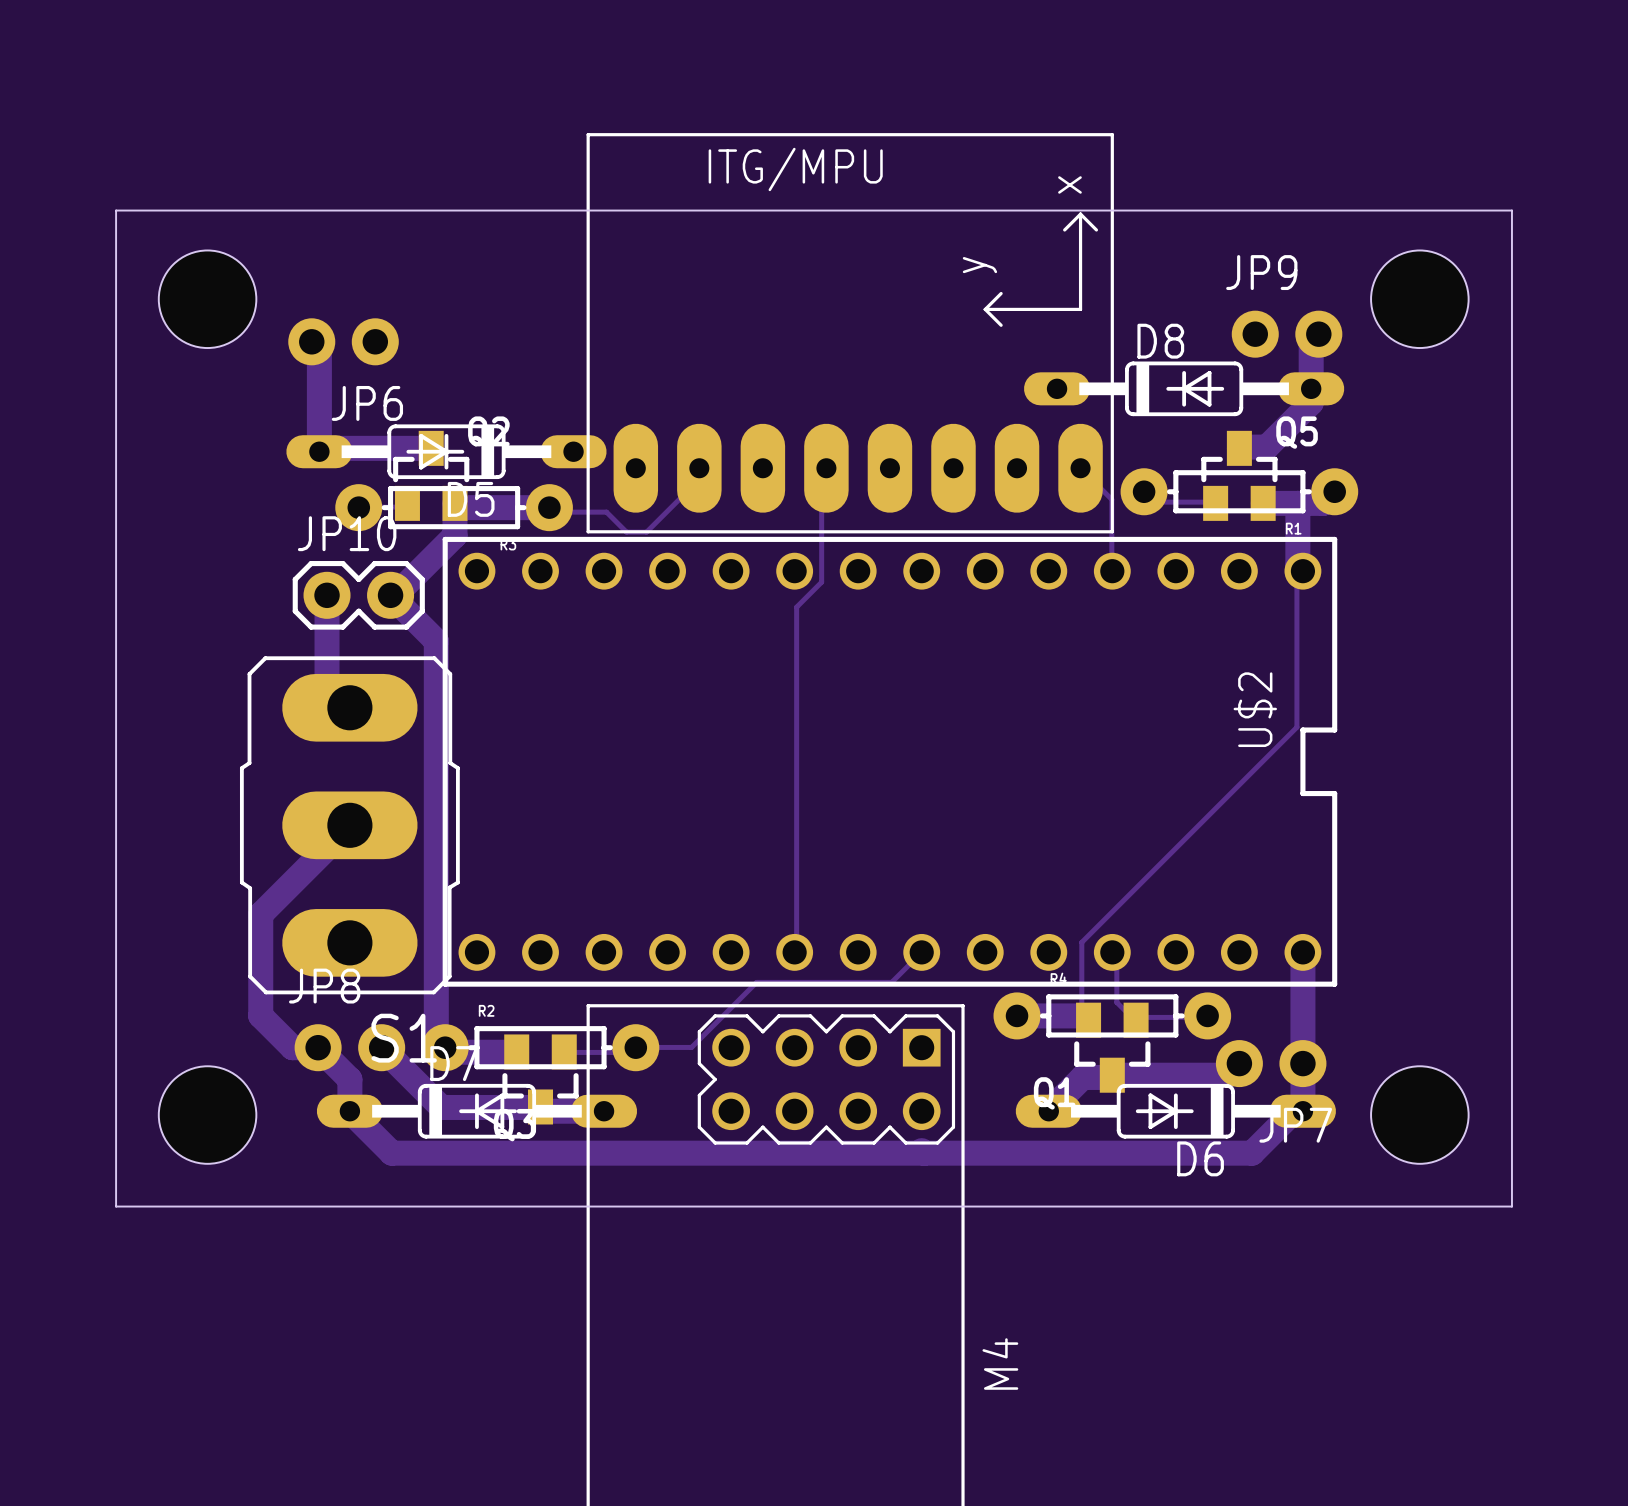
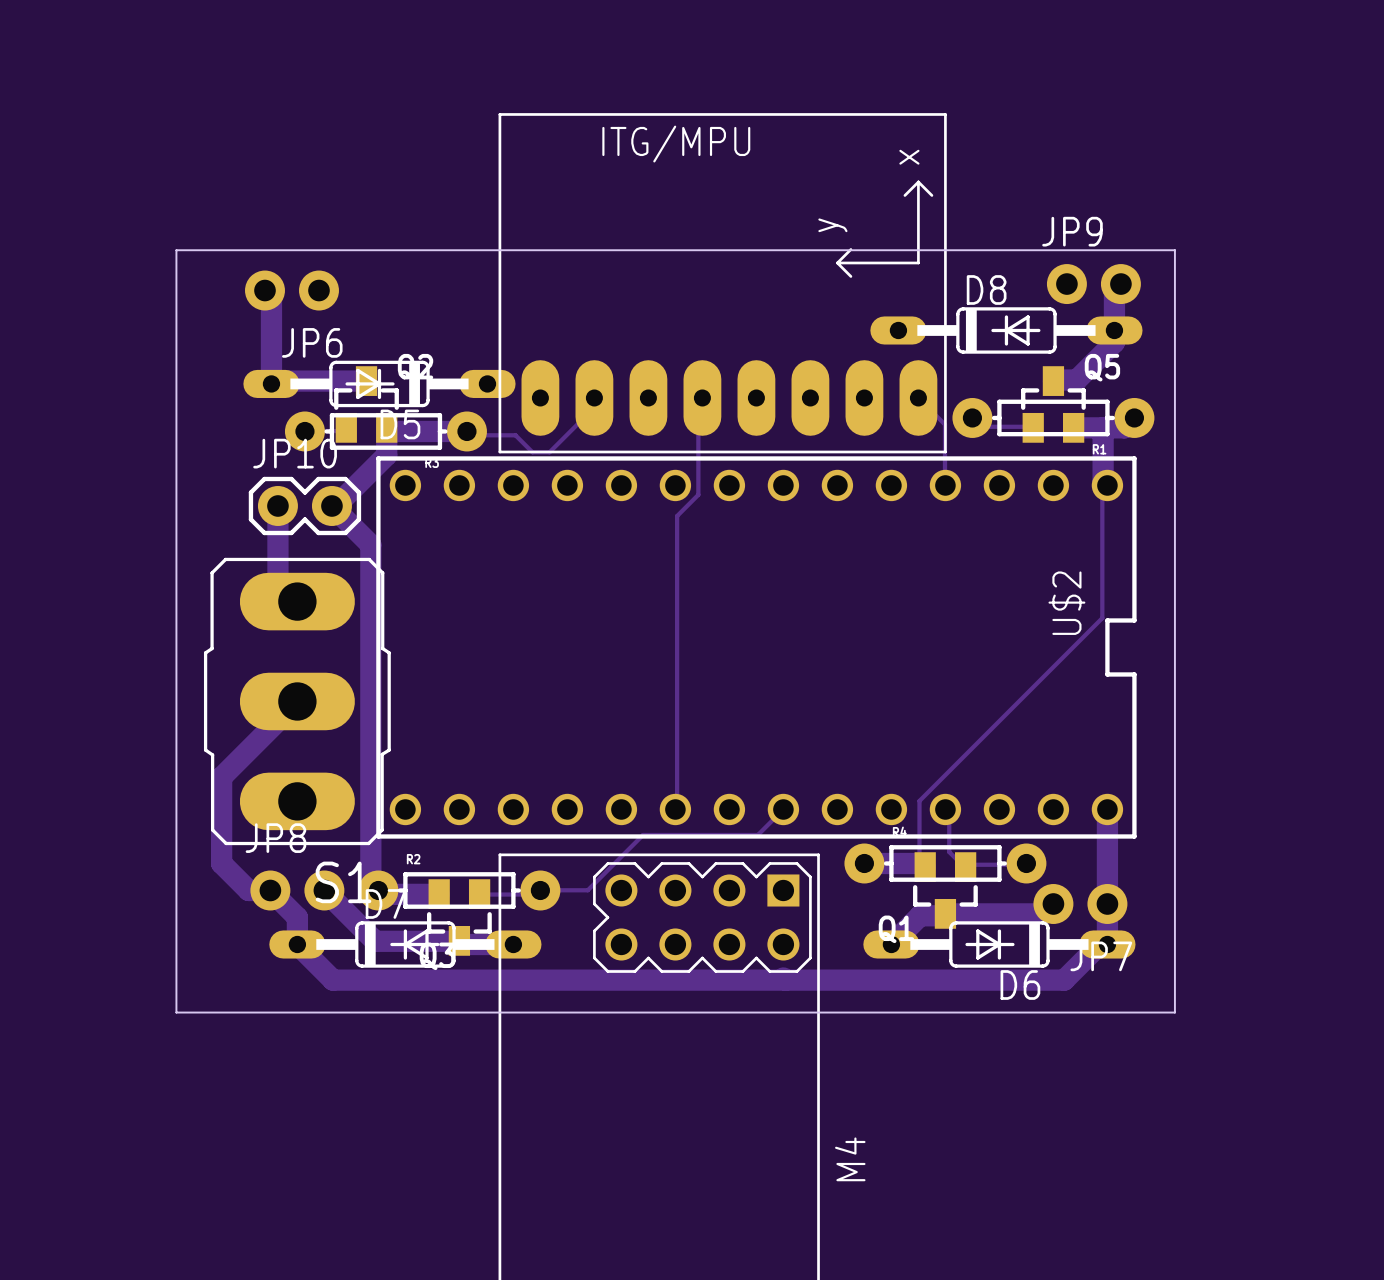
board edge: (116, 210) (1511, 210) (1511, 1206) (116, 1206) (116, 210) -> (176, 250) (176, 1012) (1174, 1012) (1174, 250) (176, 250)
hole: (207, 299) -> none
hole: (1419, 299) -> none
hole: (207, 1115) -> none
hole: (1419, 1115) -> none

